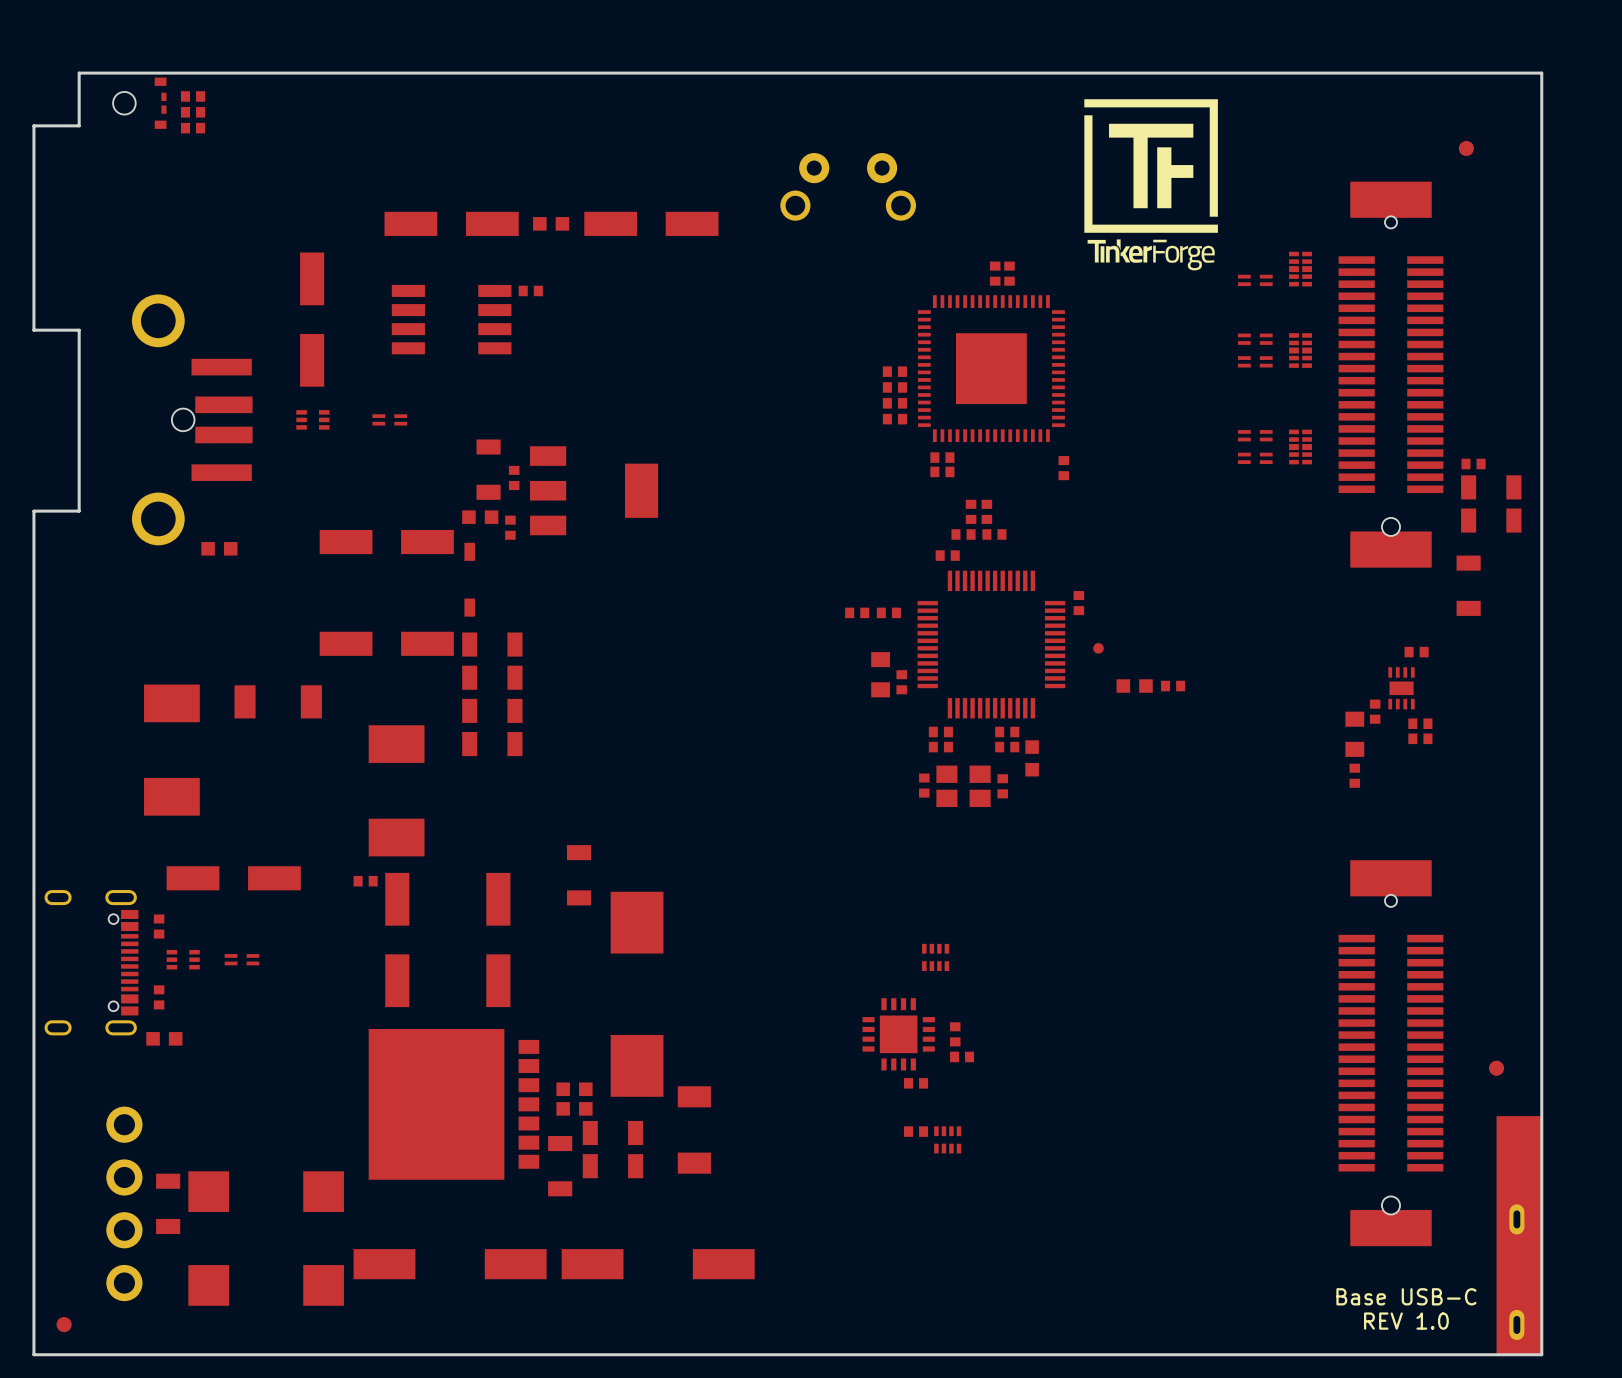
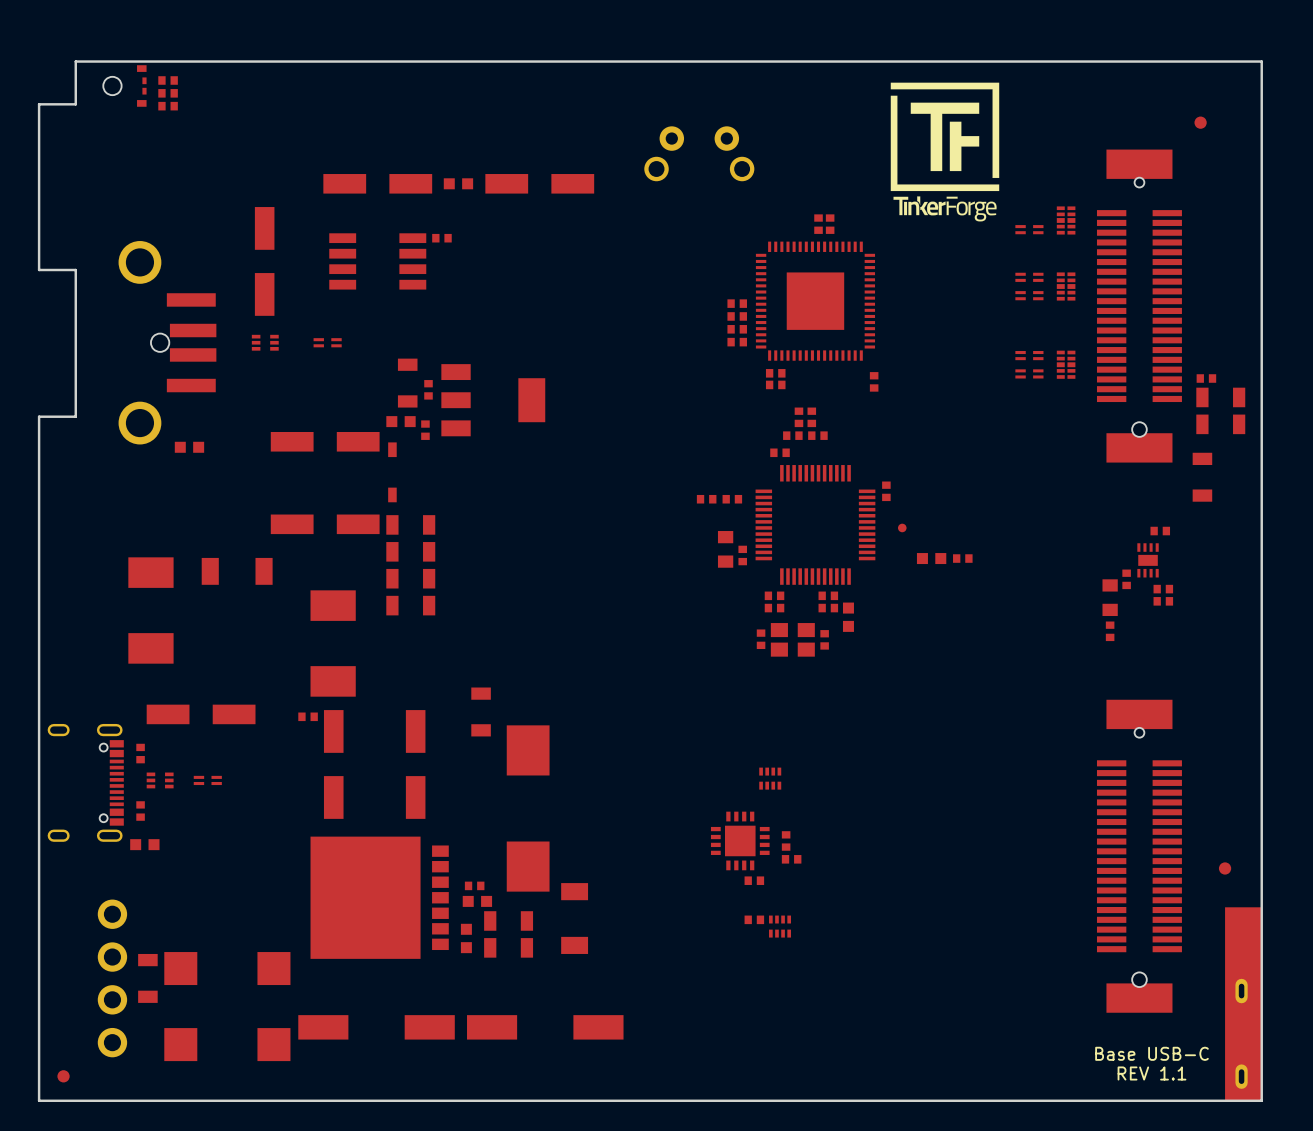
part footprint: [556, 1082, 593, 1097] -> [464, 881, 485, 891]
part footprint: [548, 1135, 573, 1197] -> [460, 923, 472, 954]
text: REV 1.0 (1406, 1321) -> REV 1.1 (1151, 1073)

